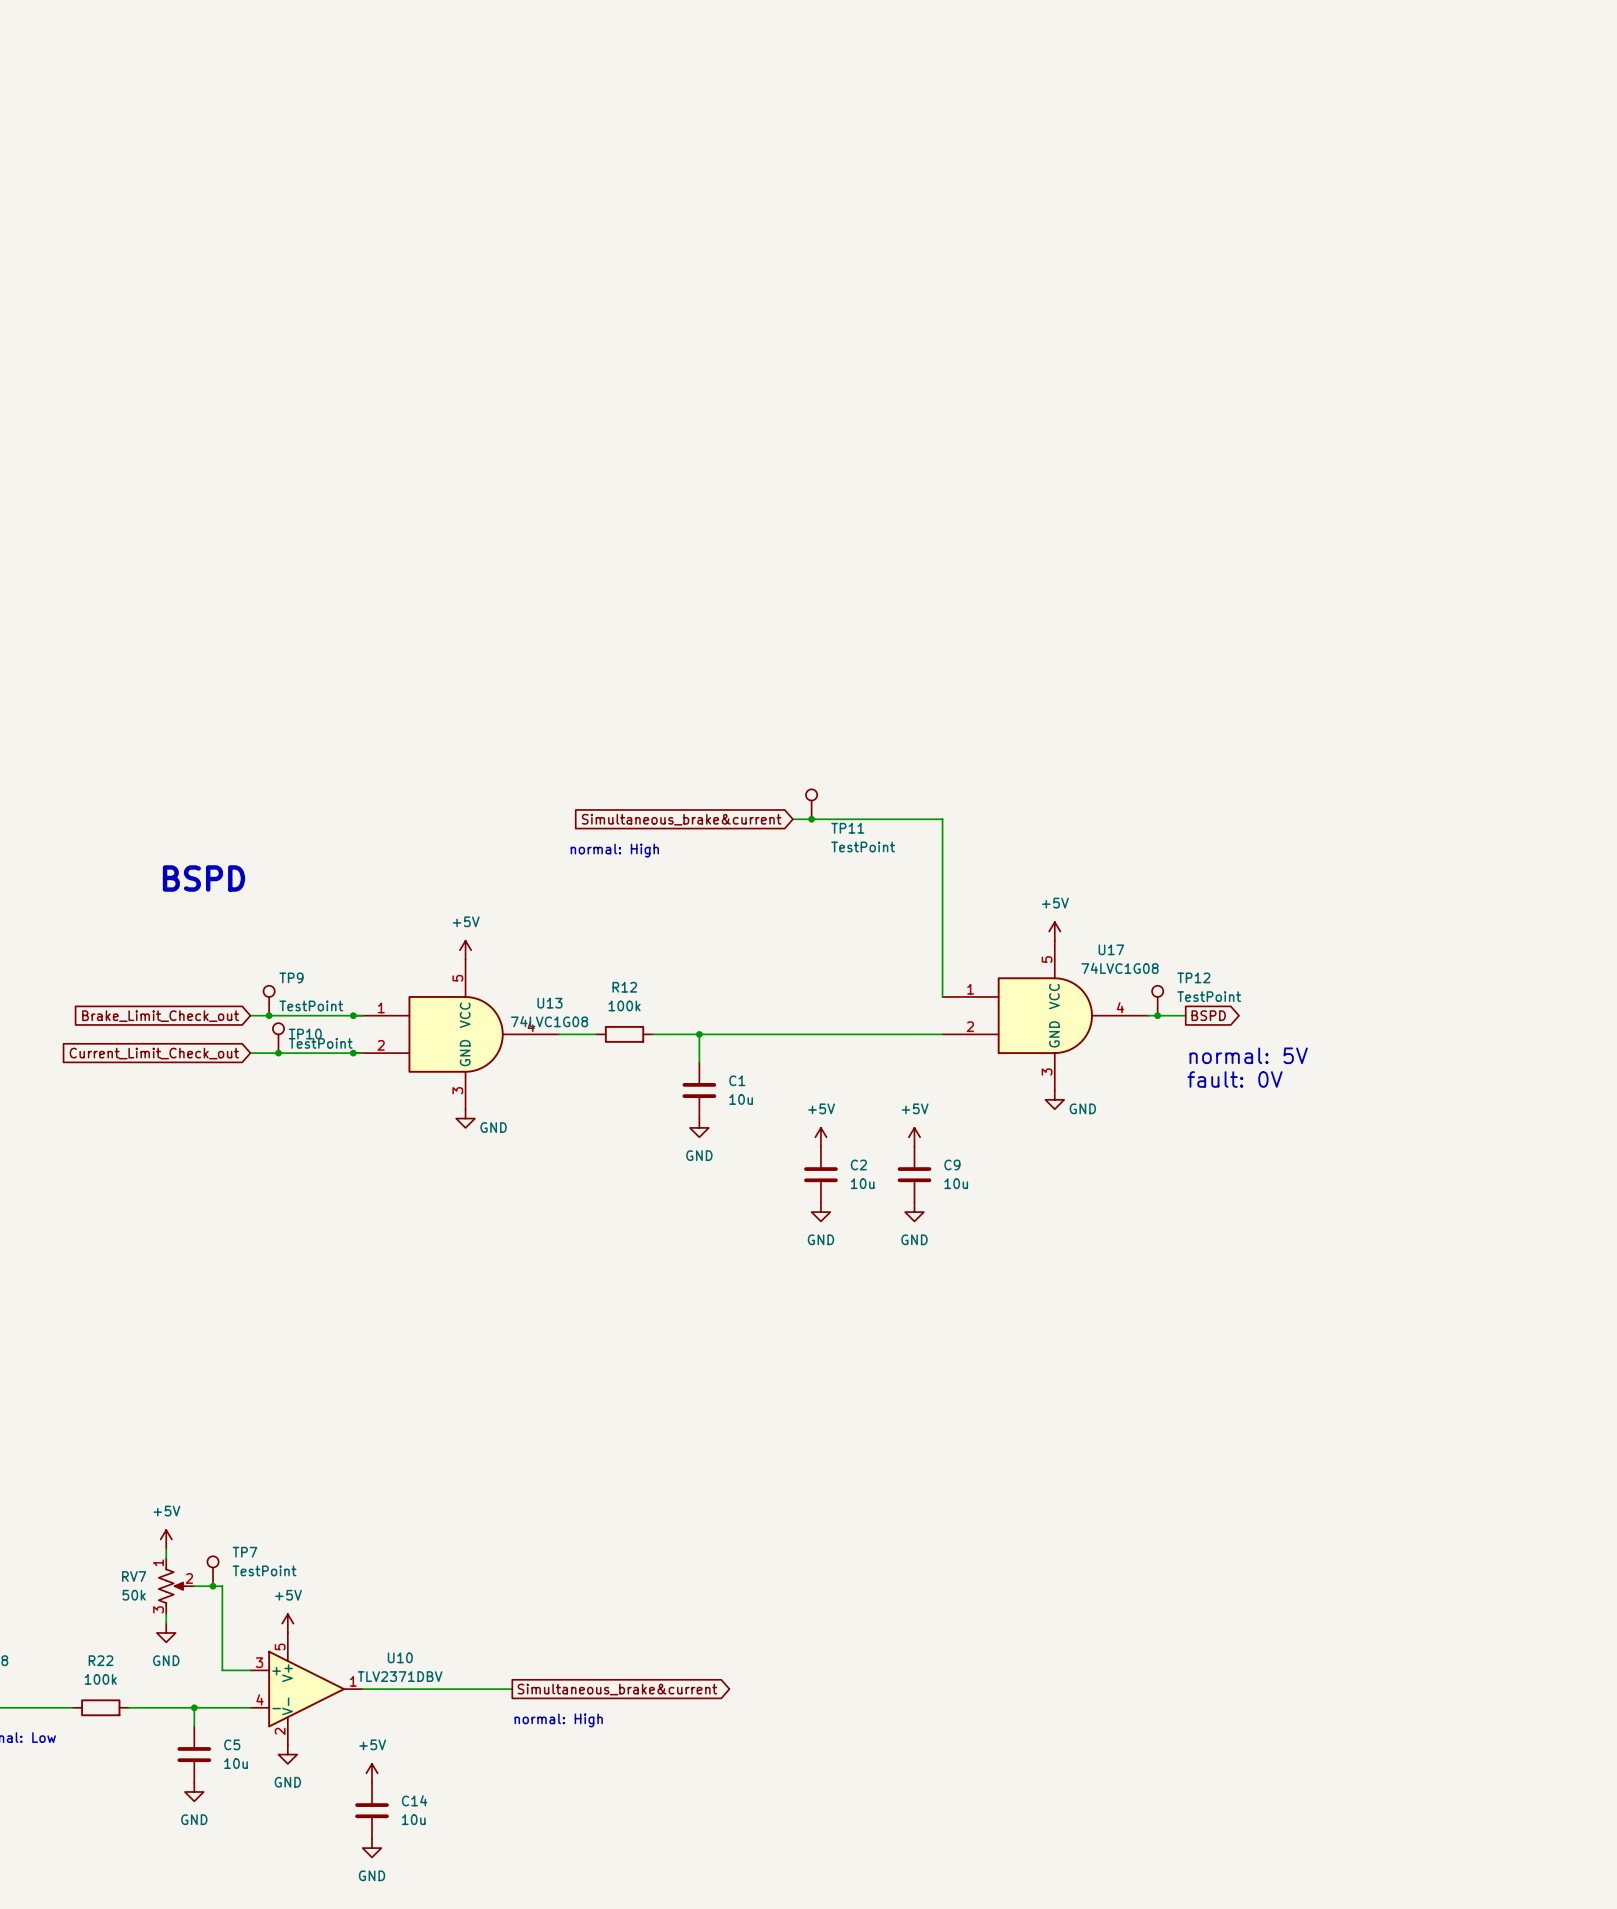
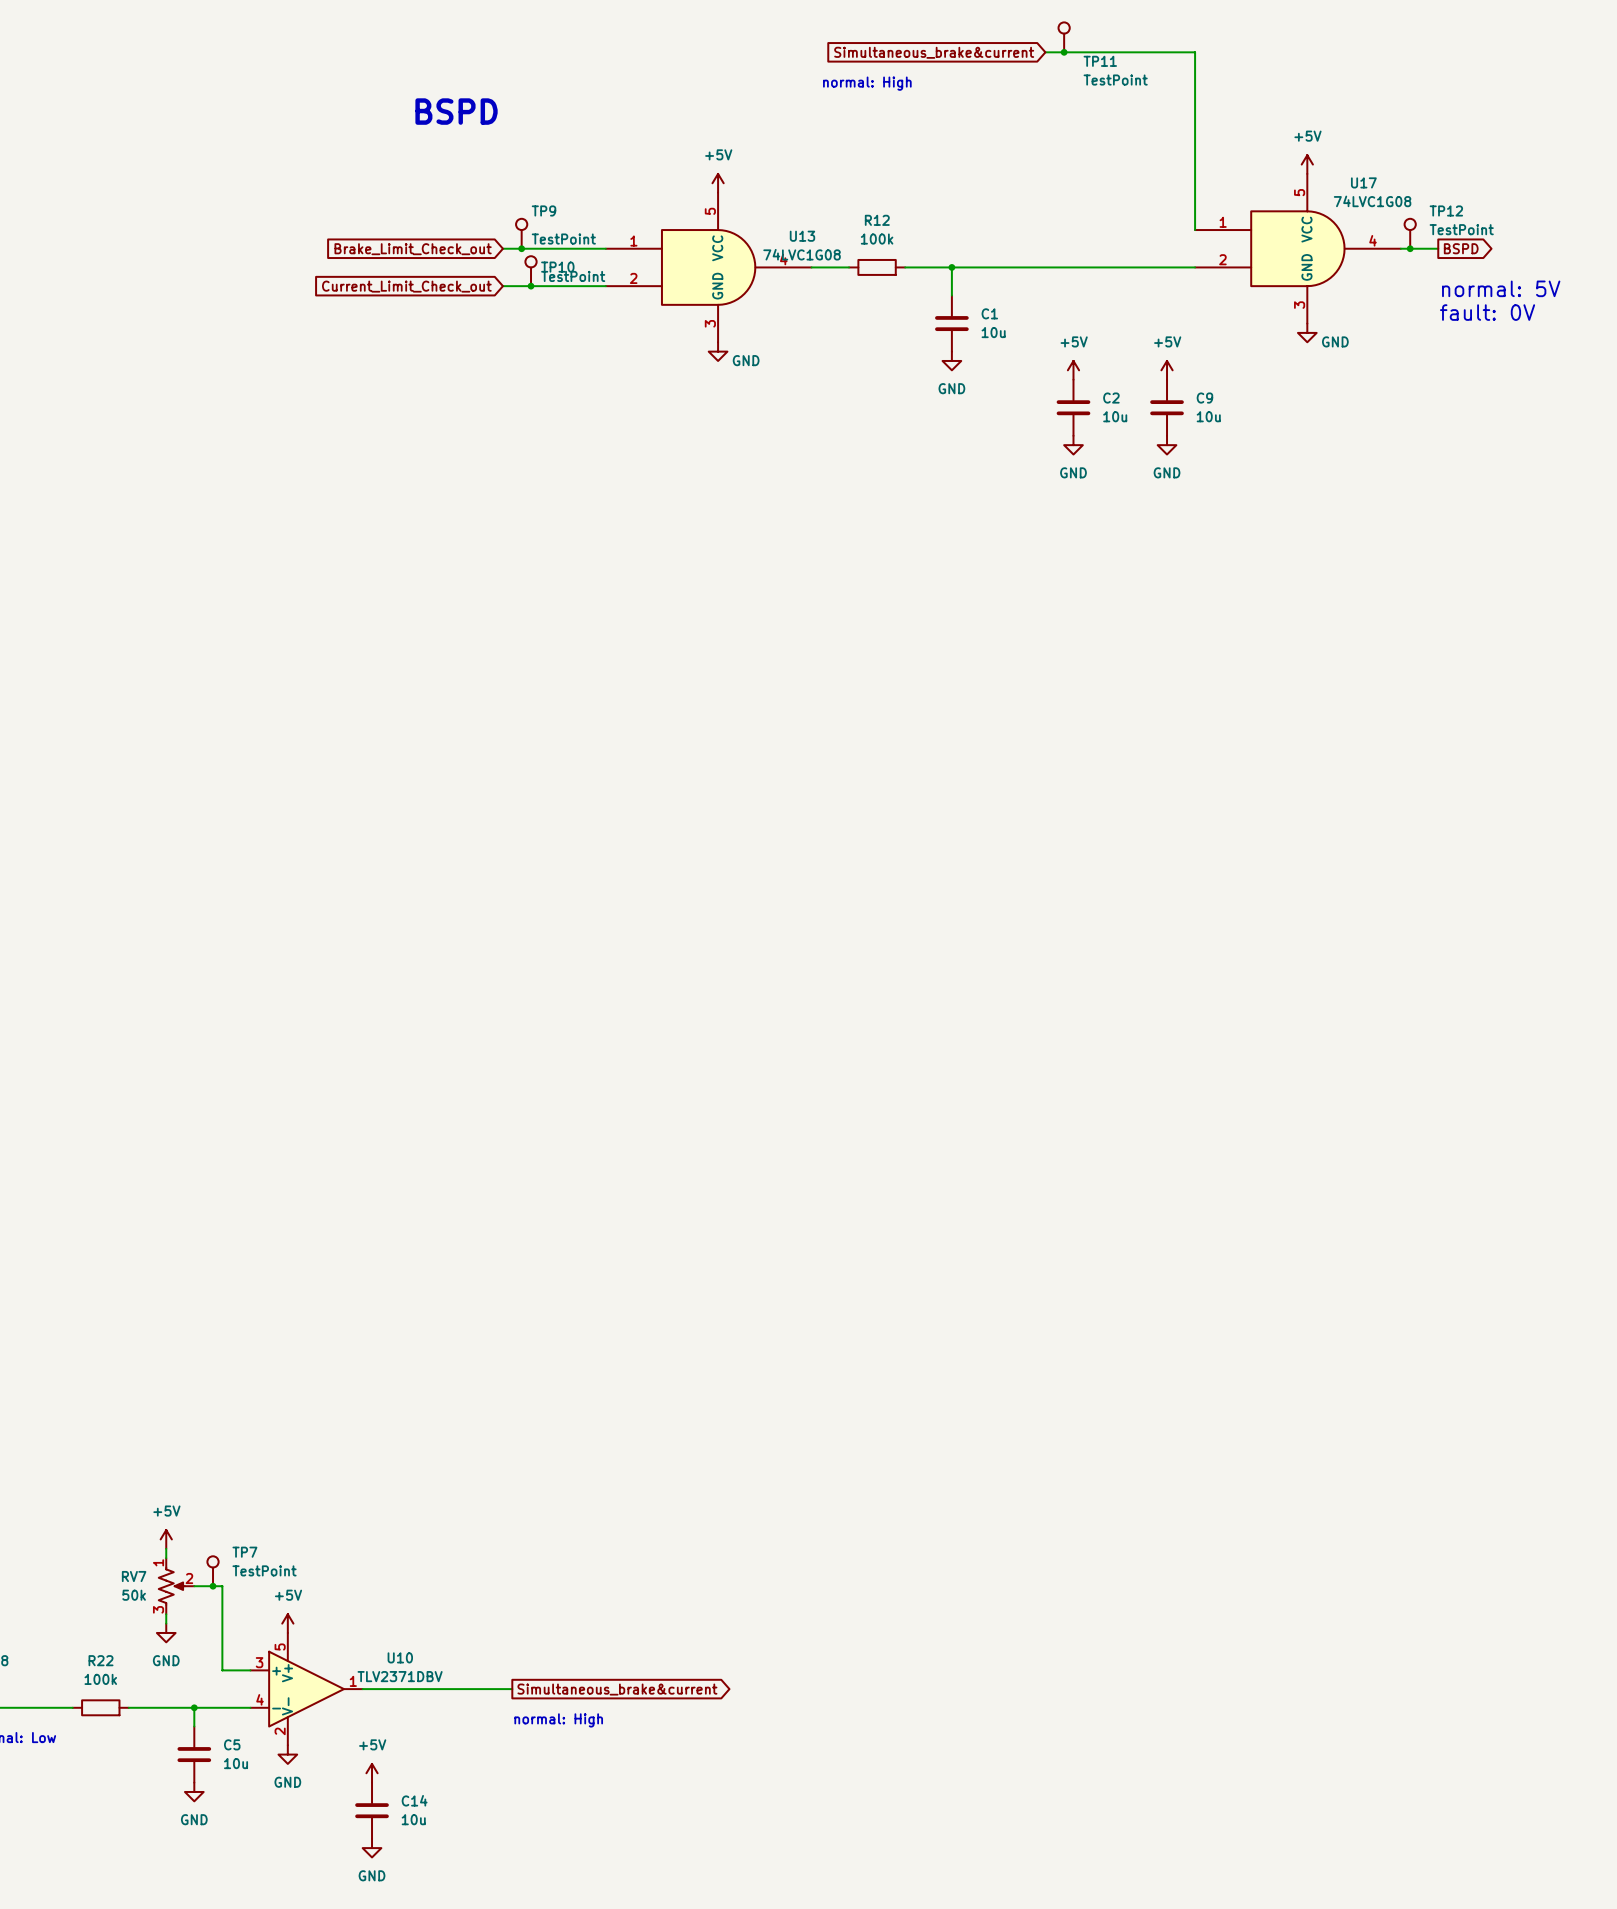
global label: none -> Simultaneous_brake&current (934, 52)
wire: none -> (1045, 52) (1195, 52) (1195, 230)
junction: none -> (1064, 52)
text: none -> normal: High (867, 83)
text: none -> BSPD (456, 111)
power symbol: none -> +5V (1307, 164)
power symbol: none -> +5V (718, 183)
wire: none -> (502, 248) (605, 248)
junction: none -> (521, 248)
wire: none -> (1400, 248) (1438, 248)
junction: none -> (1410, 248)
global label: none -> BSPD (1461, 248)
global label: none -> Brake_Limit_Check_out (413, 249)
wire: none -> (811, 267) (849, 267)
wire: none -> (905, 267) (1195, 267)
wire: none -> (951, 267) (951, 295)
junction: none -> (951, 267)
global label: none -> Current_Limit_Check_out (406, 286)
wire: none -> (502, 286) (605, 286)
junction: none -> (531, 286)
text: none -> normal: 5V (1501, 288)
text: none -> fault: 0V (1487, 312)
power symbol: none -> GND (1307, 332)
power symbol: none -> GND (718, 351)
power symbol: none -> GND (951, 360)
power symbol: none -> +5V (1073, 370)
power symbol: none -> +5V (1167, 370)
power symbol: none -> GND (1073, 445)
power symbol: none -> GND (1167, 445)
TP11 position: (811, 804) -> (1064, 37)
global label: Simultaneous_brake&current (681, 819) -> none
wire: (792, 819) (942, 819) (942, 996) -> none
junction: (811, 819) -> none
text: normal: High (614, 850) -> none
text: BSPD (203, 878) -> none
power symbol: +5V (1054, 931) -> none
power symbol: +5V (465, 950) -> none
TP9 position: (269, 1000) -> (521, 233)
TP12 position: (1157, 1000) -> (1410, 233)
wire: (250, 1015) (362, 1015) -> none
junction: (269, 1015) -> none
junction: (353, 1015) -> none
U17 position: (1045, 1015) -> (1297, 248)
wire: (1148, 1015) (1185, 1015) -> none
junction: (1157, 1015) -> none
global label: BSPD (1208, 1015) -> none
global label: Brake_Limit_Check_out (160, 1016) -> none
U13 position: (456, 1034) -> (708, 267)
wire: (559, 1034) (596, 1034) -> none
R12 position: (624, 1034) -> (877, 267)
wire: (652, 1034) (942, 1034) -> none
wire: (699, 1034) (699, 1062) -> none
junction: (699, 1034) -> none
TP10 position: (278, 1038) -> (531, 271)
global label: Current_Limit_Check_out (154, 1053) -> none
wire: (250, 1053) (362, 1053) -> none
junction: (278, 1053) -> none
junction: (353, 1053) -> none
text: normal: 5V (1248, 1055) -> none
text: fault: 0V (1235, 1079) -> none
C1 position: (699, 1090) -> (951, 323)
power symbol: GND (1054, 1099) -> none
power symbol: GND (465, 1118) -> none
power symbol: GND (699, 1127) -> none
power symbol: +5V (820, 1137) -> none
power symbol: +5V (914, 1137) -> none
C2 position: (820, 1174) -> (1073, 407)
C9 position: (914, 1174) -> (1167, 407)
power symbol: GND (820, 1212) -> none
power symbol: GND (914, 1212) -> none

